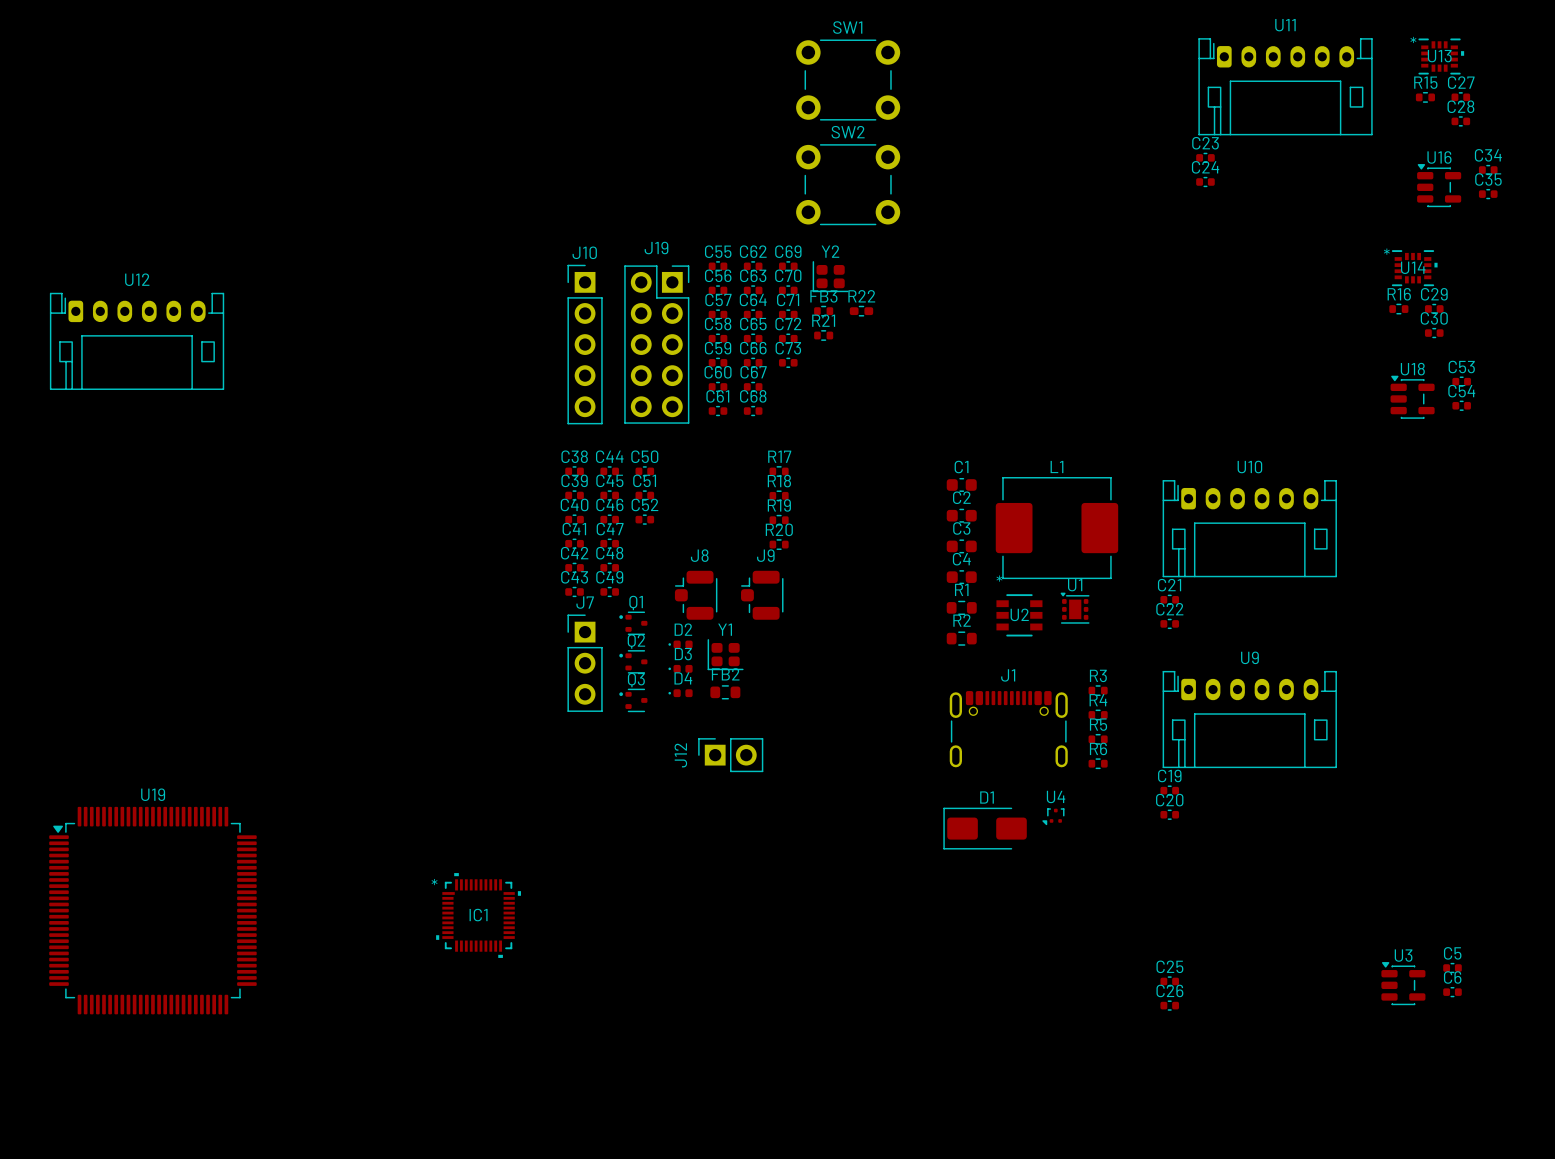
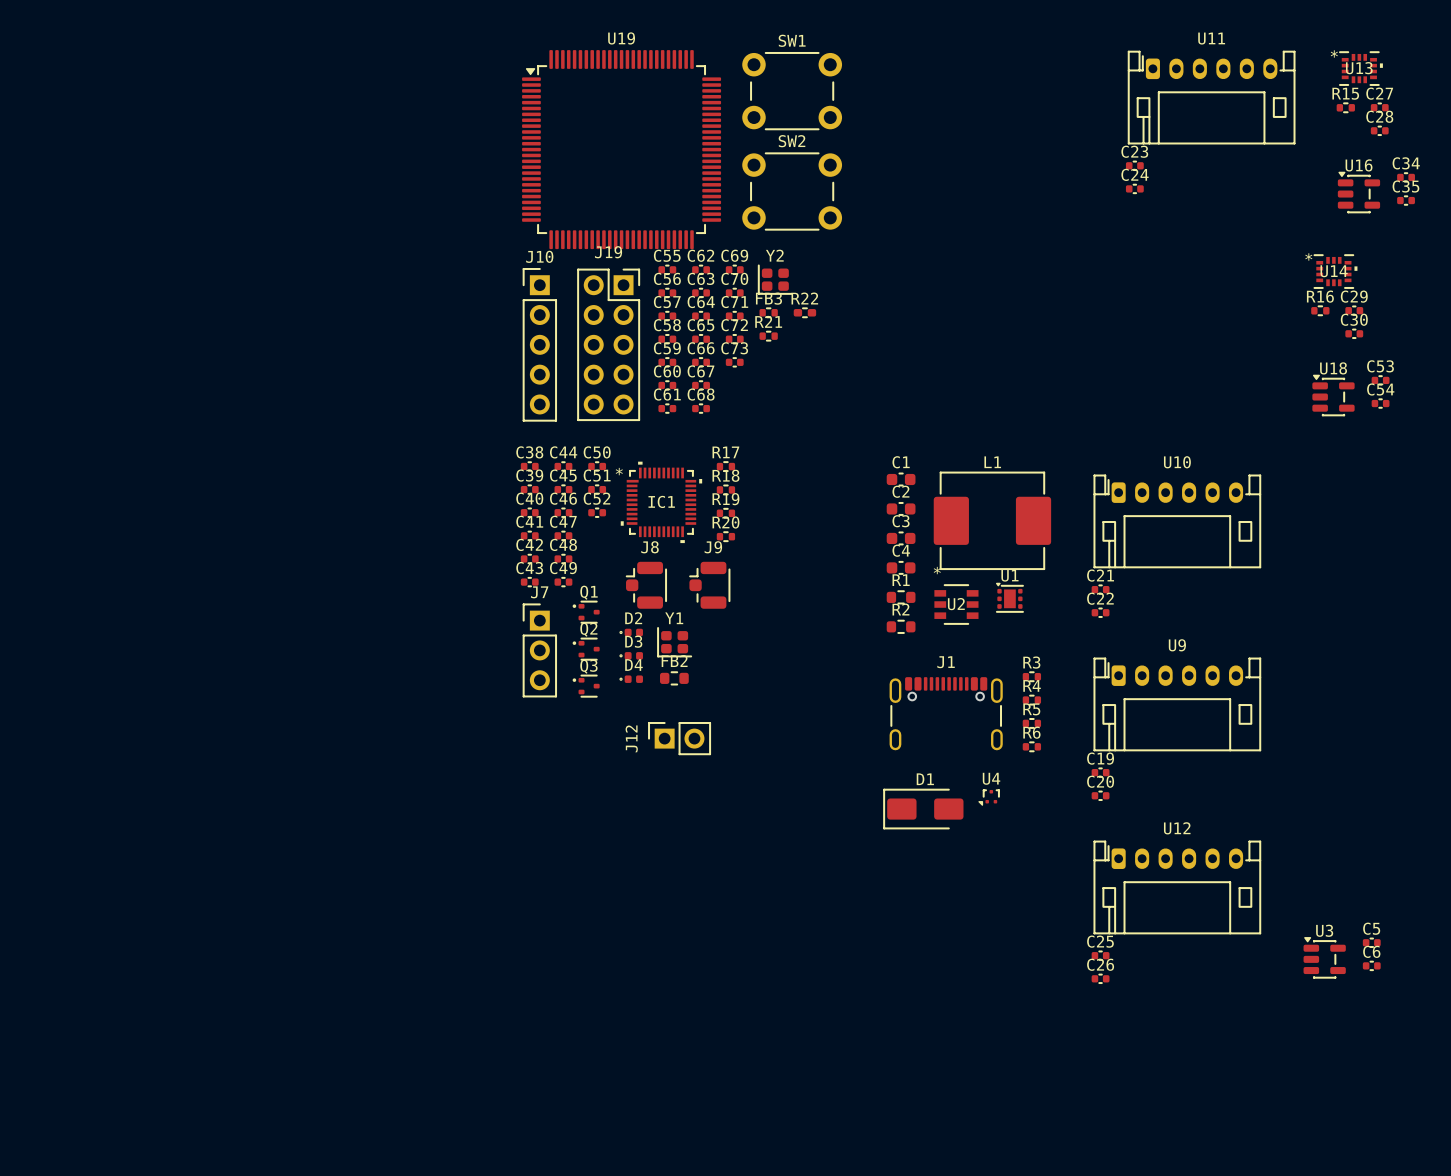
U12 position: (137, 341) -> (1177, 887)
U19 position: (152, 910) -> (621, 149)
IC1 position: (478, 915) -> (661, 502)

